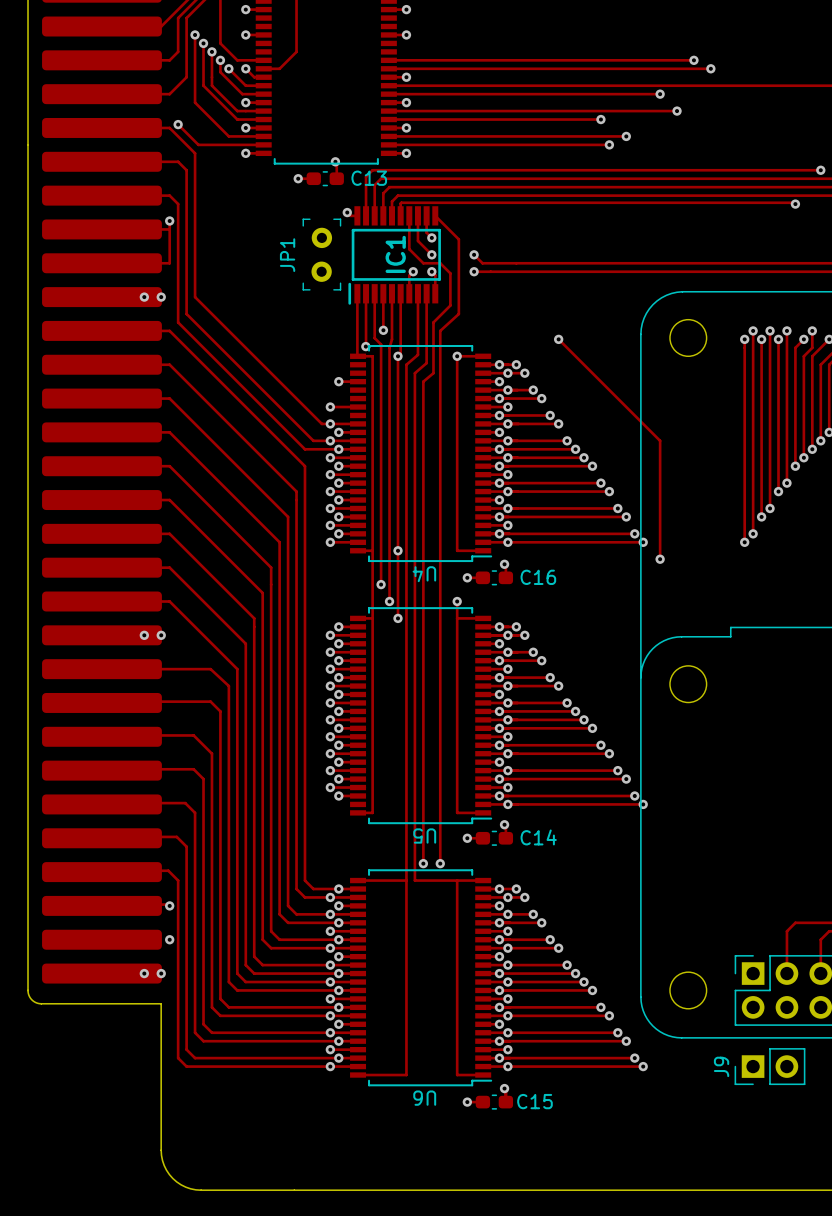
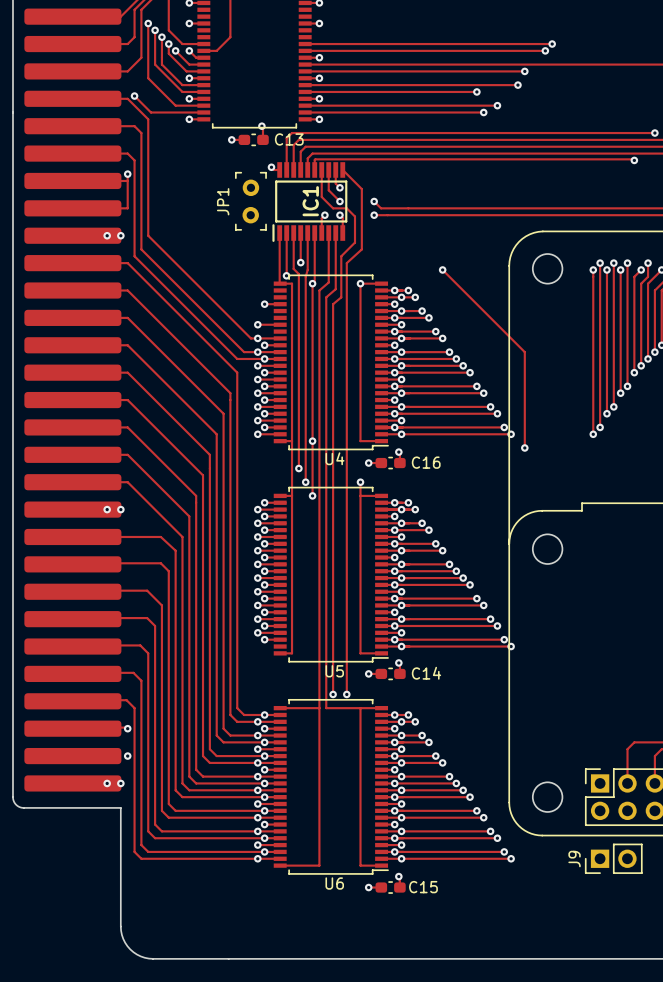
track: (685, 68) (710, 68) -> none
via: none -> (545, 50)
via: (710, 68) -> none
track: (651, 111) (677, 111) -> none
via: none -> (517, 85)
via: (677, 111) -> none
U4 name rotation: 0° (424, 574) -> 180° (334, 458)
U5 name rotation: 0° (424, 836) -> 180° (334, 671)
U6 name rotation: 0° (424, 1098) -> 180° (334, 883)

